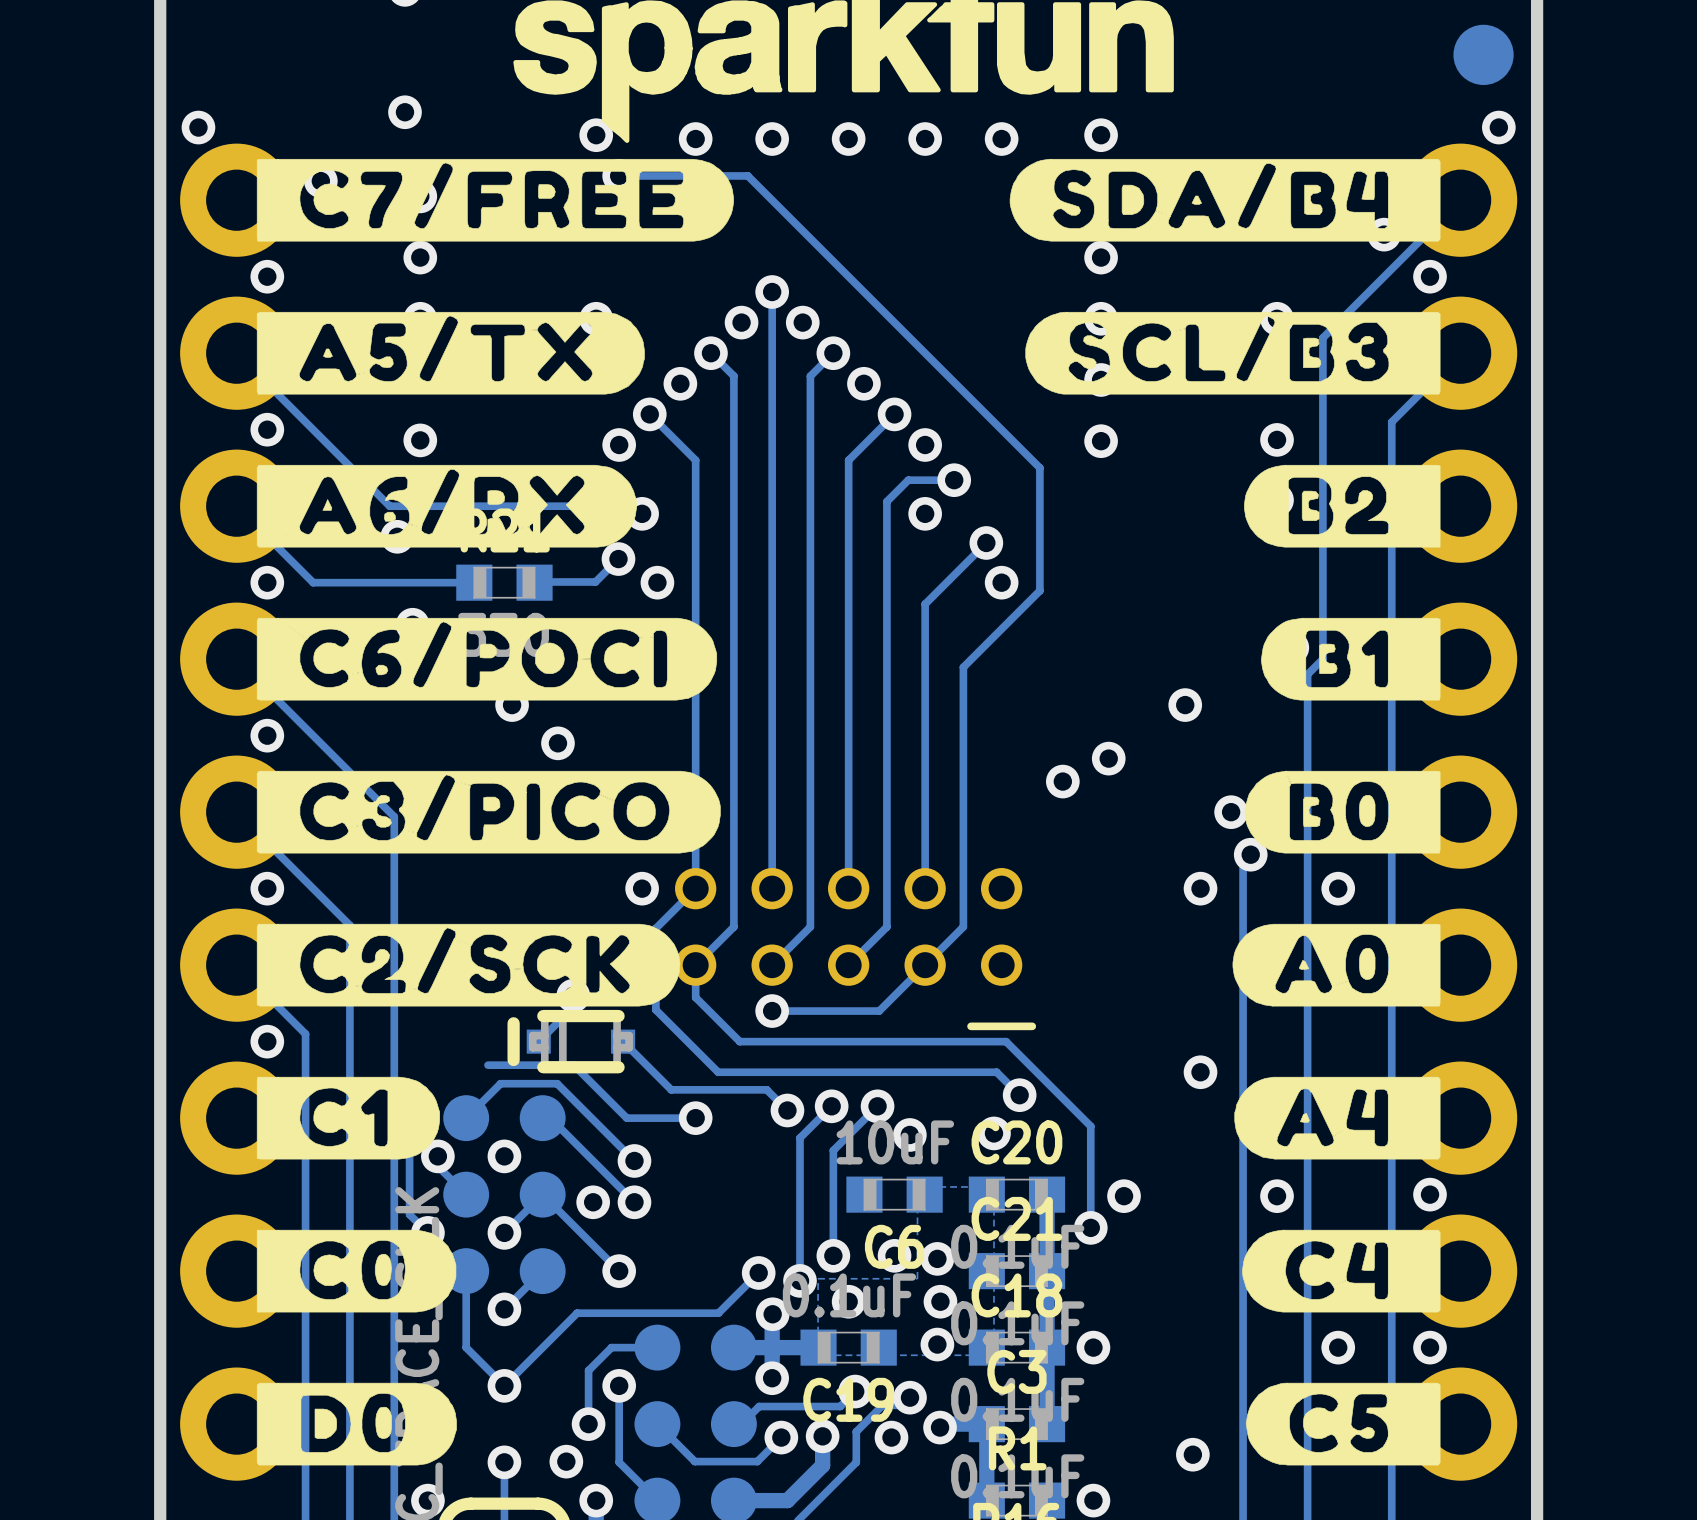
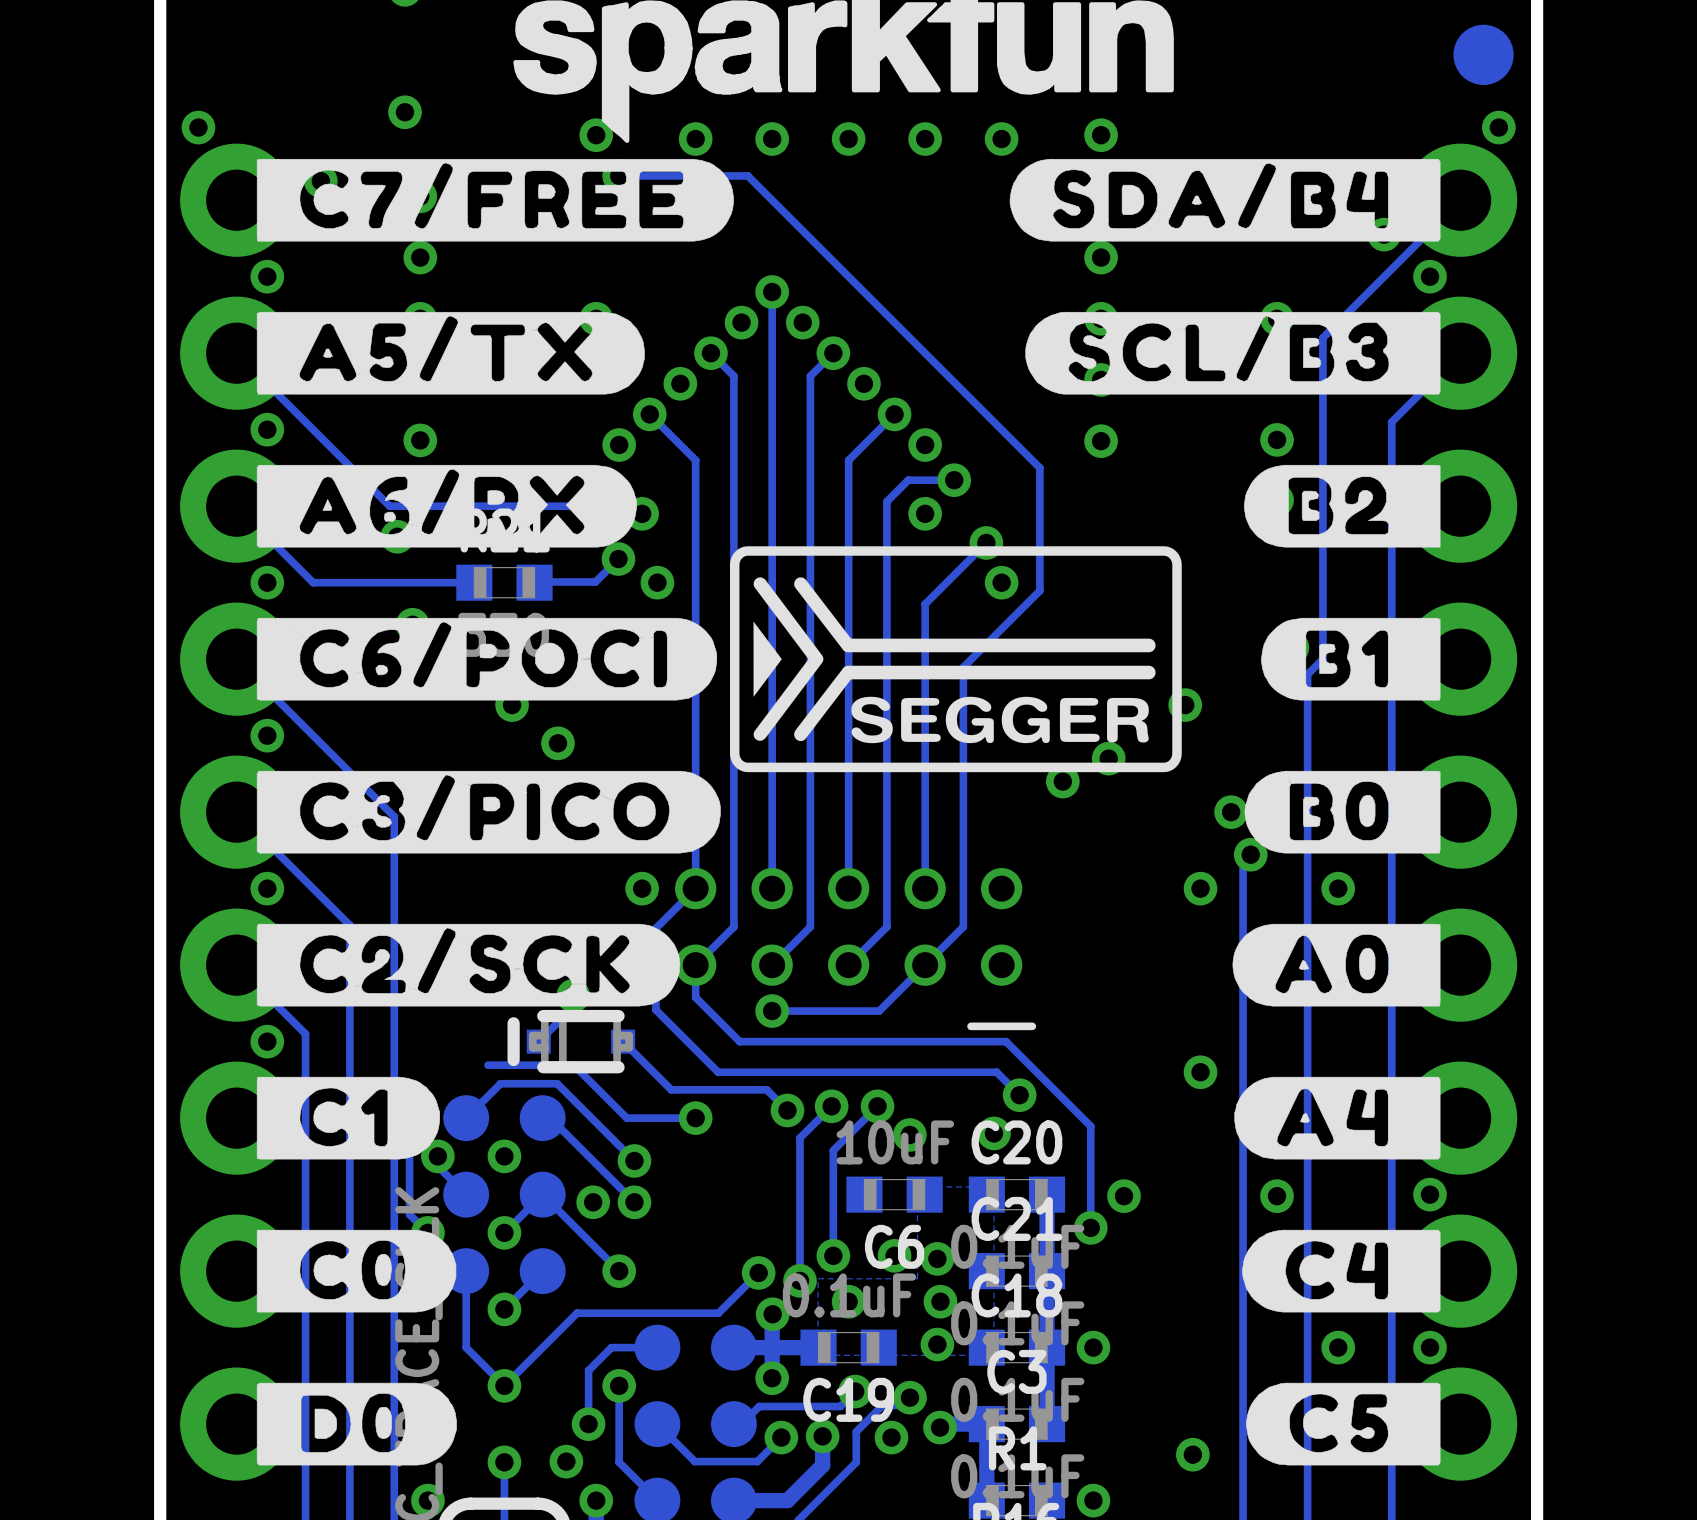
drawing: none -> [729, 546, 1182, 773]

